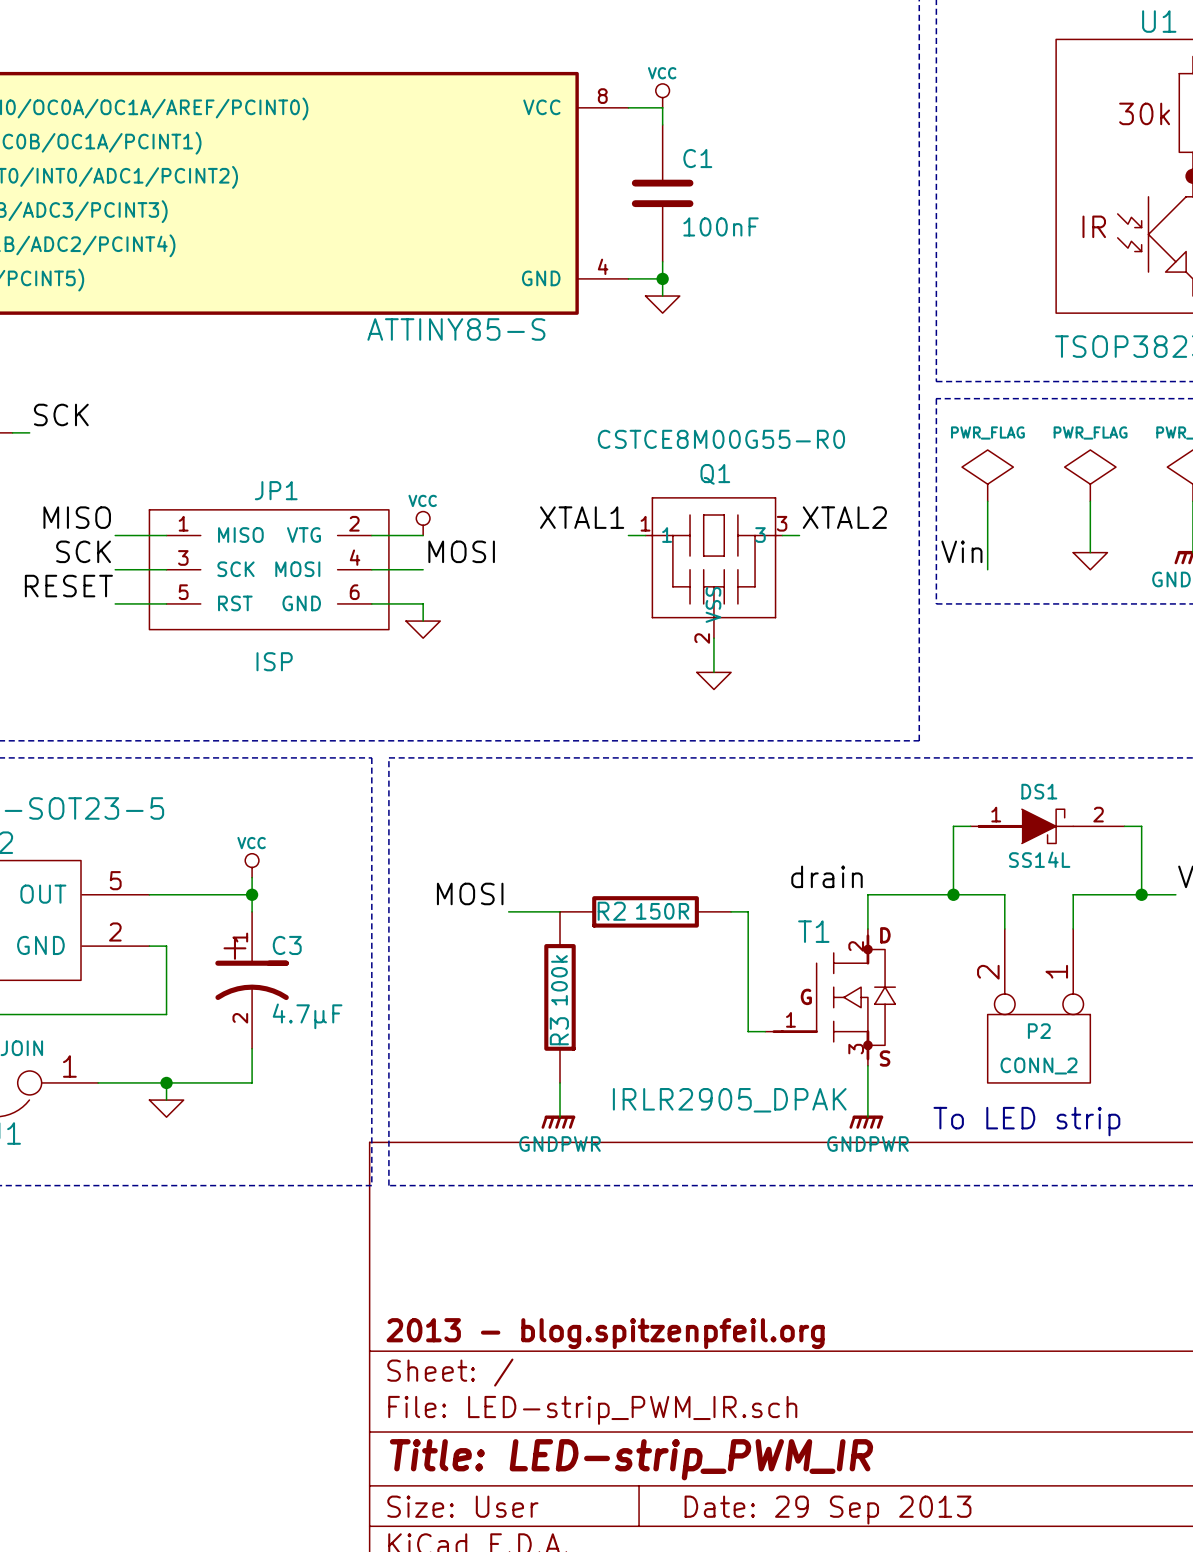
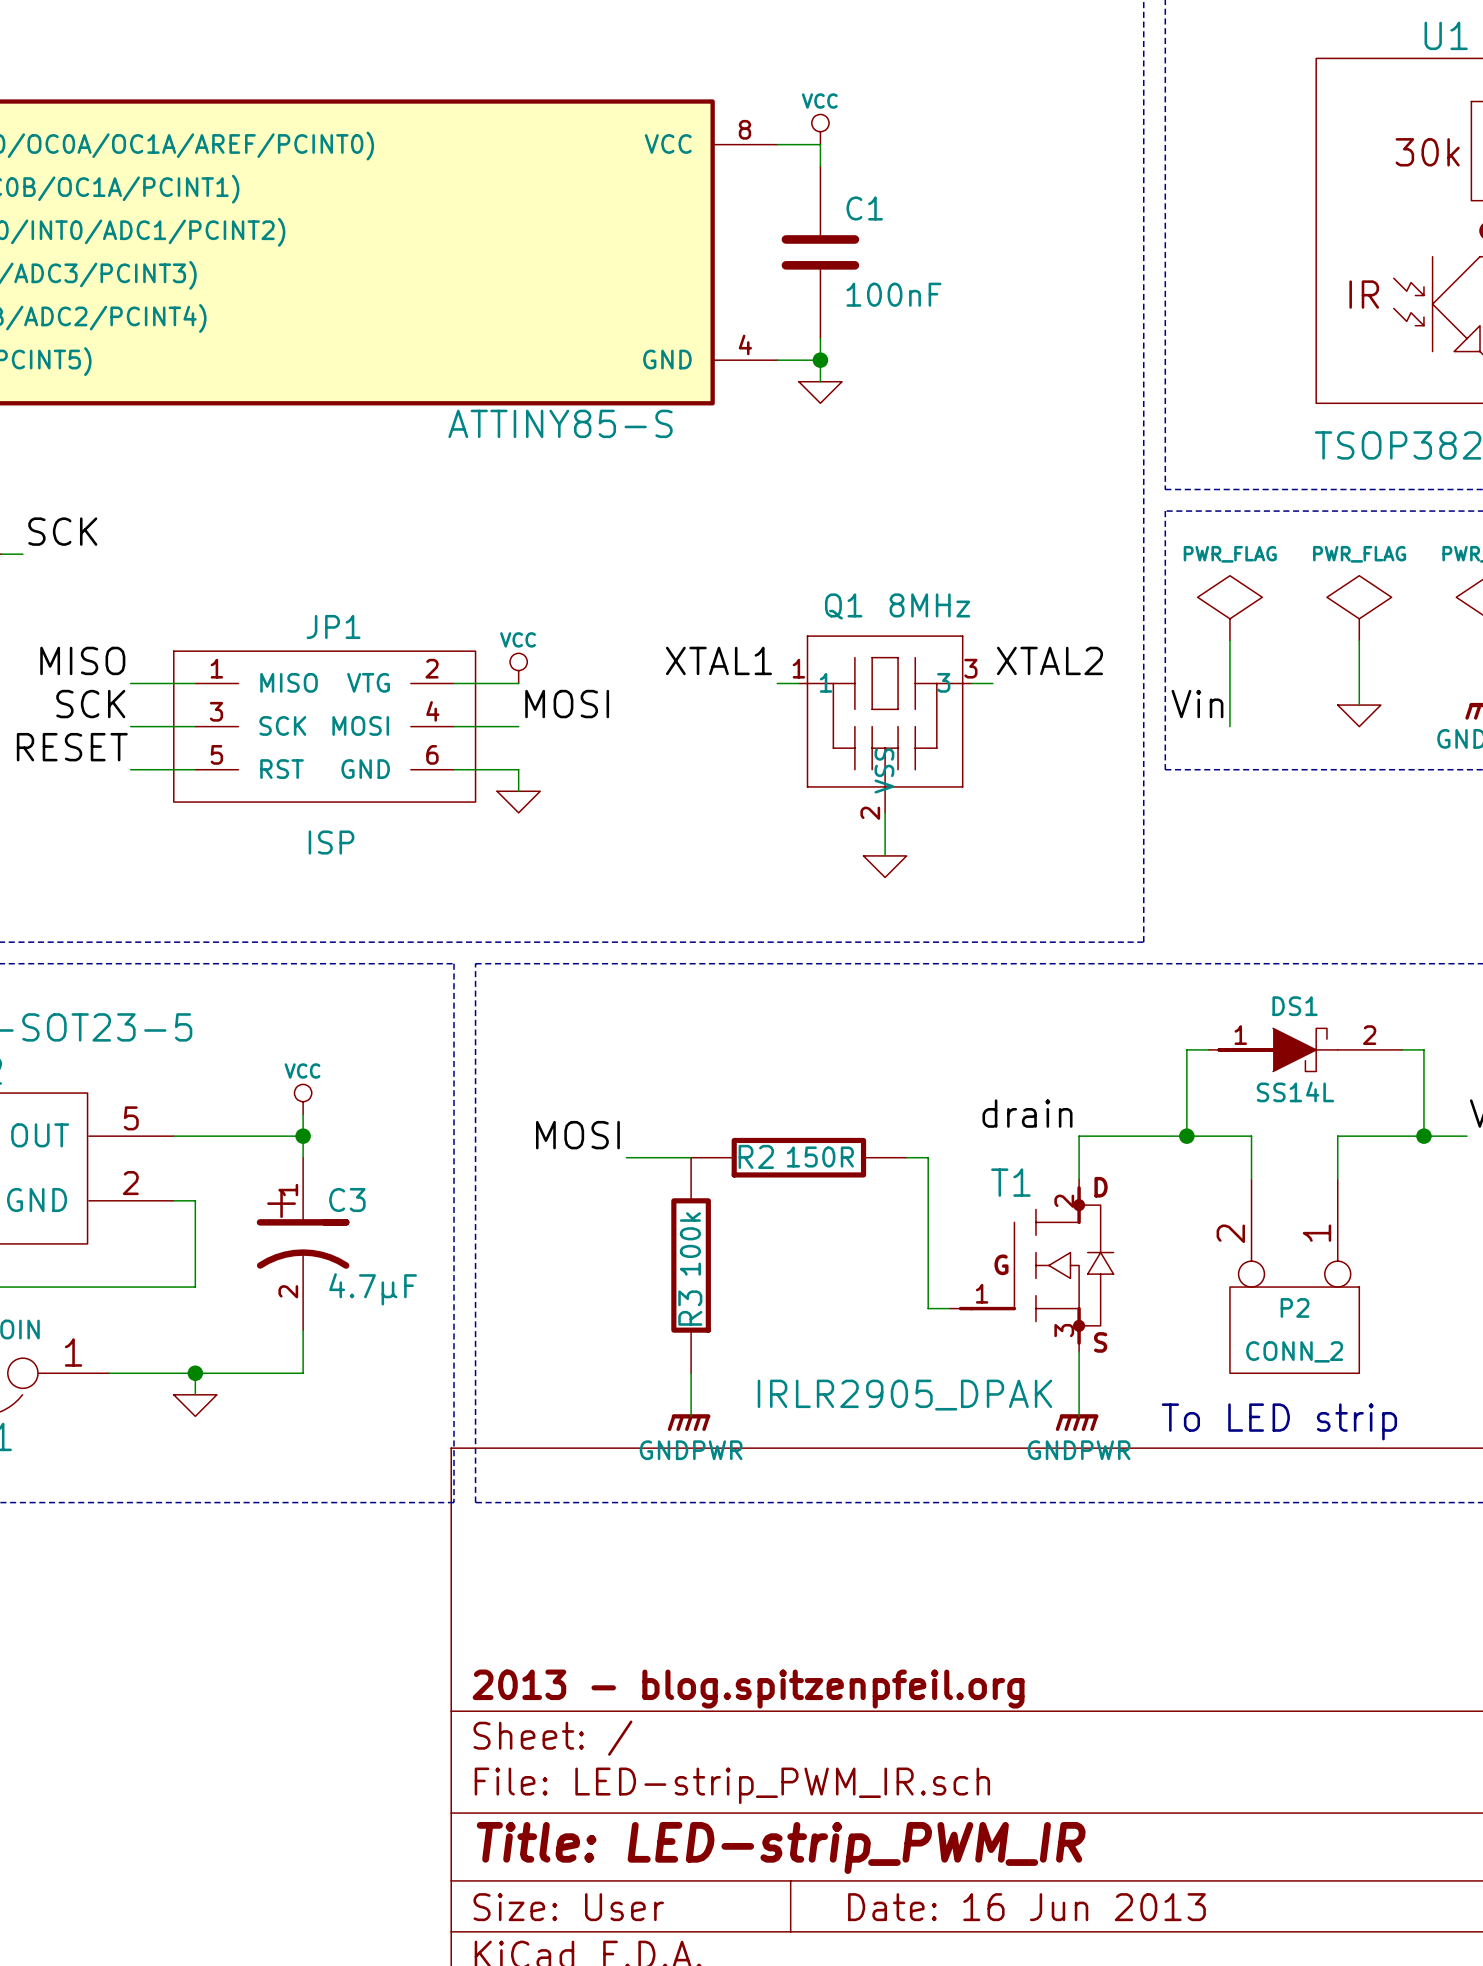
Q1 value: CSTCE8M00G55-R0 (721, 439) -> 8MHz (929, 605)
Q1 name position: Q1 (715, 474) -> Q1 (843, 606)
title block: Date: 29 Sep 2013 (828, 1510) -> Date: 16 Jun 2013 (1026, 1907)

